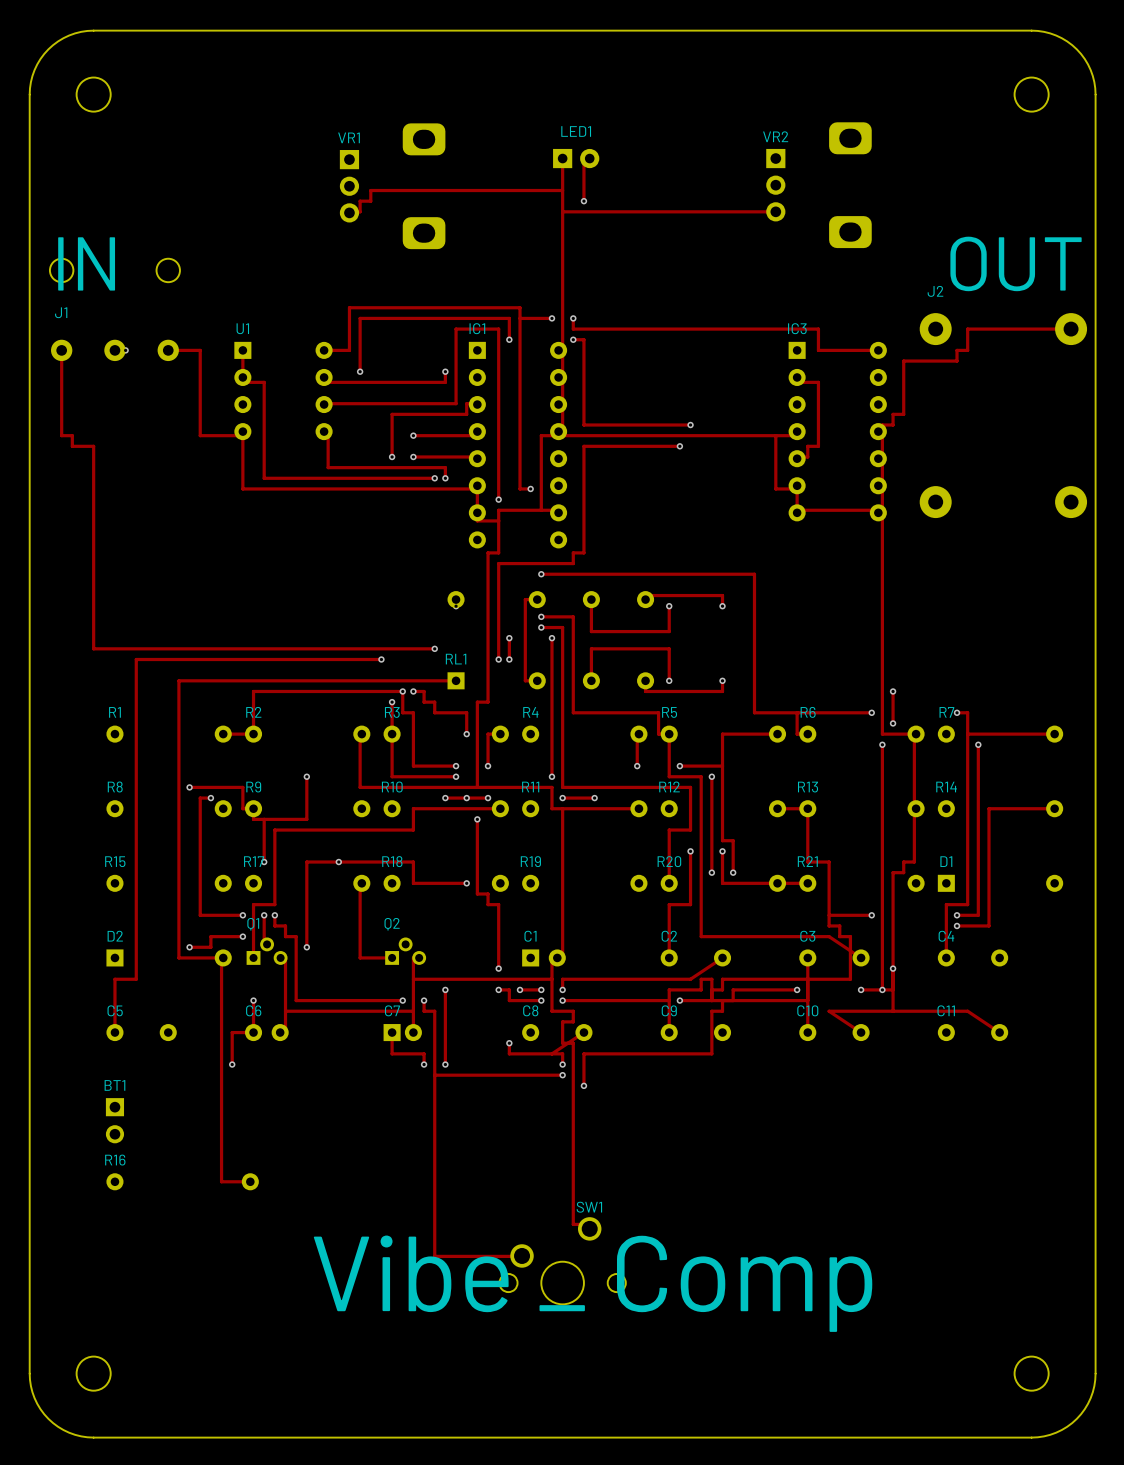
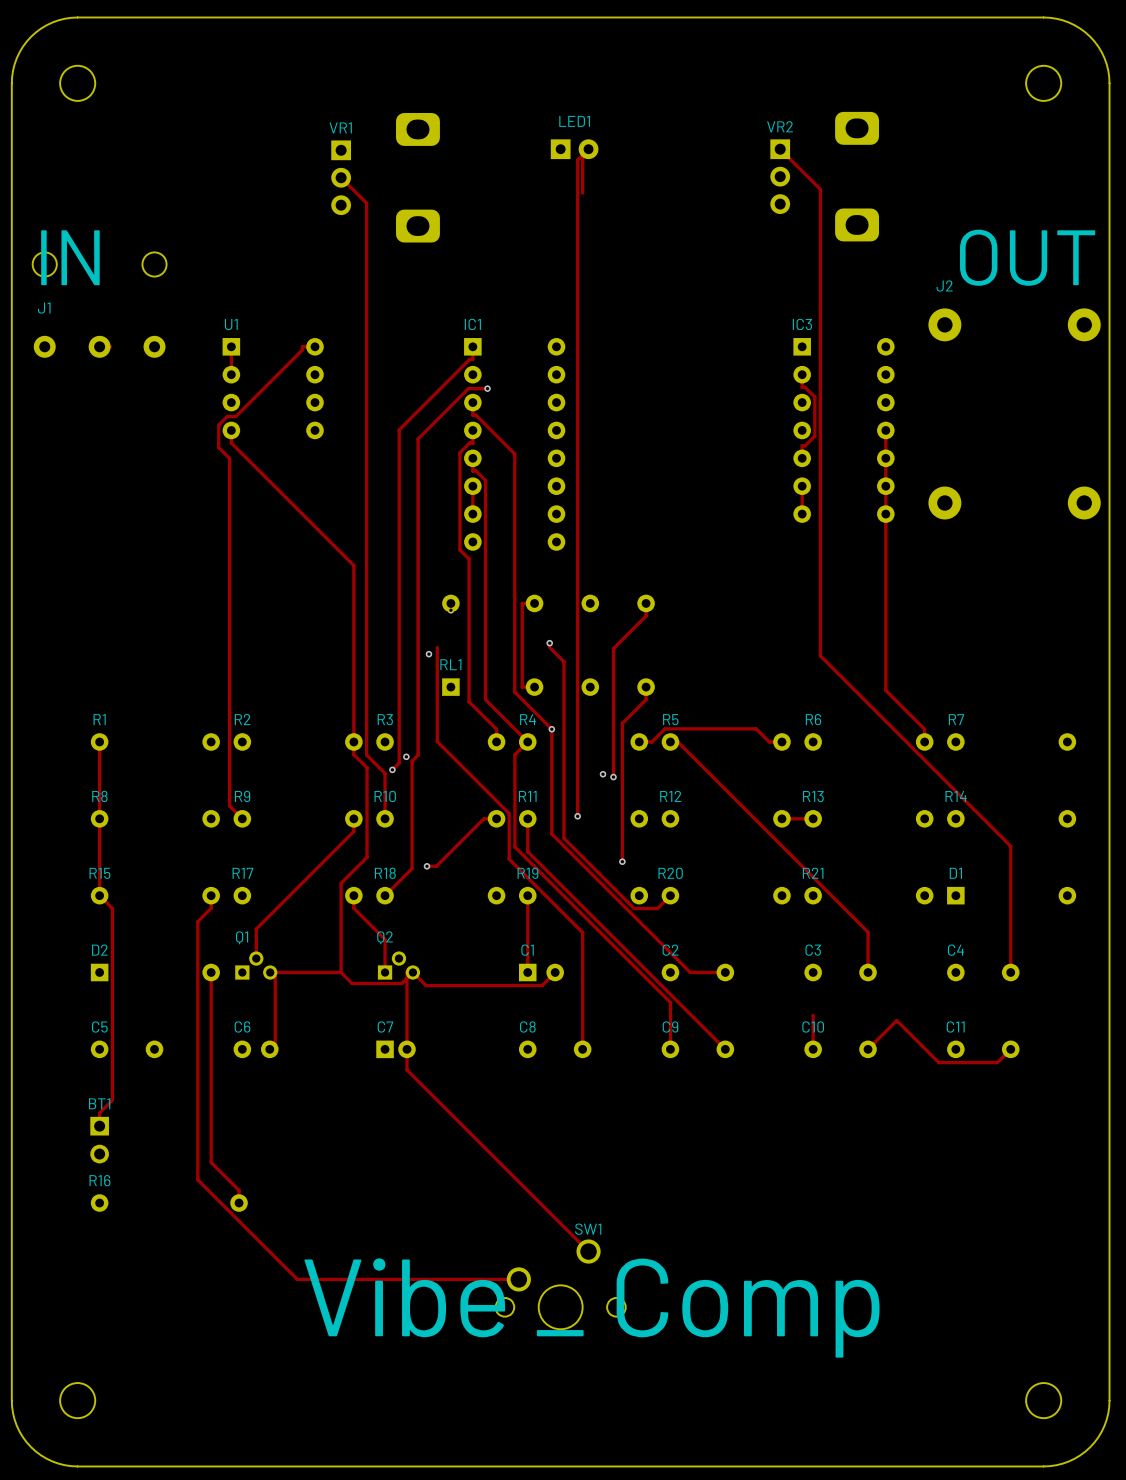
track: (562, 158) (562, 435) (558, 431) -> none
track: none -> (588, 149) (577, 160) (577, 816)
track: none -> (780, 149) (820, 189) (820, 655) (1010, 846) (1010, 972)
track: (562, 190) (370, 190) (370, 201) (360, 201) (360, 211) (349, 212) -> none
via: (583, 201) -> none
track: (562, 211) (775, 211) -> none
track: (520, 318) (551, 318) -> none
via: (551, 318) -> none
track: (573, 318) (573, 329) (818, 329) (818, 350) (882, 350) -> none
via: (573, 318) -> none
track: (1074, 329) (967, 329) (967, 350) (957, 350) (957, 361) (903, 361) (903, 414) (893, 414) (893, 425) (882, 425) (882, 734) (916, 734) -> (885, 430) (885, 690) (924, 729) (924, 741)
track: (509, 339) (509, 318) (360, 318) (360, 371) -> none
via: (509, 339) -> none
track: (573, 339) (583, 339) (583, 425) (690, 425) -> none
via: (573, 339) -> none
track: (61, 350) (61, 435) (72, 435) (72, 446) (93, 446) (93, 648) (434, 648) -> none
via: (125, 350) -> none
track: (168, 350) (200, 350) (200, 435) (242, 435) -> none
track: (324, 350) (349, 350) (349, 307) (520, 307) (520, 488) (530, 488) -> (315, 346) (302, 346) (302, 349) (235, 416) (227, 416) (218, 425) (218, 447) (229, 458) (229, 806) (242, 818)
track: none -> (472, 346) (472, 359) (469, 359) (399, 429) (399, 763) (392, 769)
via: (360, 371) -> none
track: (445, 371) (445, 382) (328, 382) (324, 377) -> none
via: (445, 371) -> none
track: (242, 377) (242, 382) (264, 382) (264, 478) (434, 478) -> none
track: (797, 382) (818, 382) (818, 446) (807, 446) (807, 456) (797, 456) -> (802, 379) (802, 387) (805, 387) (814, 397) (814, 436) (805, 445) (802, 445) (802, 456)
track: none -> (487, 388) (468, 388) (418, 438) (418, 755) (412, 761) (412, 868) (385, 895)
via: none -> (487, 388)
track: (324, 404) (456, 403) (456, 329) (498, 329) (498, 499) -> none
track: (477, 404) (466, 403) (466, 414) (392, 414) (392, 456) -> none
via: (690, 425) -> none
track: (324, 431) (328, 435) (328, 467) (445, 467) (445, 478) -> none
track: (797, 431) (797, 435) (541, 435) (541, 510) -> none
track: (413, 435) (477, 435) -> (496, 741) (496, 729) (469, 701) (469, 559) (459, 549) (459, 452) (469, 443) (472, 443) (472, 434)
via: (413, 435) -> none
track: (775, 435) (775, 488) (797, 488) -> none
track: (242, 443) (242, 488) (477, 488) -> (231, 443) (353, 565) (353, 754) (367, 767) (367, 857) (341, 883) (341, 972)
track: (679, 446) (583, 446) (583, 552) (573, 552) (573, 563) (498, 563) (498, 659) -> none
via: (679, 446) -> none
via: (392, 456) -> none
track: (413, 456) (477, 456) (477, 458) -> none
via: (413, 456) -> none
via: (434, 478) -> none
via: (445, 478) -> none
via: (530, 488) -> none
via: (498, 499) -> none
track: (797, 510) (882, 510) (878, 512) -> none
track: (477, 512) (477, 520) (498, 520) -> none
track: (558, 512) (562, 510) (498, 510) (498, 552) (488, 552) (488, 702) (477, 702) (477, 787) -> none
track: (541, 574) (754, 574) (754, 712) (871, 712) -> none
via: (541, 574) -> none
track: (591, 599) (591, 631) (669, 631) (669, 606) -> none
track: (645, 599) (645, 595) (722, 595) (722, 606) -> (646, 603) (646, 616) (613, 648) (613, 777)
via: (669, 606) -> none
via: (722, 606) -> none
track: (541, 616) (573, 616) (573, 712) (658, 712) (658, 734) (669, 734) (669, 776) (701, 776) (701, 936) (829, 936) (861, 957) -> (670, 741) (677, 741) (868, 932) (868, 972)
via: (541, 616) -> none
track: (541, 627) (562, 627) (562, 787) (690, 787) (690, 830) (669, 830) (669, 883) -> (549, 647) (563, 661) (563, 838) (634, 908) (657, 908) (670, 895)
via: (541, 627) -> none
track: (509, 638) (509, 659) -> none
via: (509, 638) -> none
track: (551, 638) (551, 776) -> none
track: (381, 659) (136, 659) (136, 979) (114, 979) (114, 1032) -> none
via: (381, 659) -> none
via: (498, 659) -> none
via: (509, 659) -> none
track: (456, 680) (178, 680) (178, 957) (223, 957) -> (239, 1203) (239, 1190) (211, 1162) (211, 972)
track: (591, 680) (591, 648) (669, 648) (669, 680) -> none
via: (669, 680) -> none
track: (722, 680) (722, 691) (645, 691) -> (622, 861) (622, 723) (646, 698)
via: (722, 680) -> none
via: (402, 691) -> none
track: (413, 691) (424, 691) (424, 702) (434, 702) (434, 712) (466, 712) (466, 734) -> none
via: (413, 691) -> none
track: (893, 691) (893, 723) -> none
via: (893, 691) -> none
track: (392, 702) (392, 764) -> (341, 177) (366, 203) (366, 755) (385, 773)
via: (392, 702) -> none
track: (797, 712) (797, 734) (807, 734) -> none
via: (871, 712) -> none
track: (957, 712) (967, 712) (967, 904) (946, 904) (946, 957) -> none
via: (957, 712) -> none
via: none -> (551, 729)
via: (893, 723) -> none
track: none -> (99, 741) (99, 895) (112, 908) (112, 1100) (99, 1112) (99, 1126)
track: (221, 734) (253, 734) (253, 691) (402, 691) (402, 712) (413, 712) (413, 766) (456, 766) -> none
track: (361, 734) (360, 734) (360, 787) (551, 787) (551, 808) (638, 808) -> none
via: (466, 734) -> none
track: (500, 734) (488, 734) (488, 766) -> none
track: (638, 734) (637, 734) (637, 766) -> (639, 741) (651, 741) (665, 728) (756, 728) (769, 741)
track: (765, 734) (722, 734) (722, 840) (733, 840) (733, 872) -> none
track: (914, 734) (914, 862) (903, 862) (903, 872) (893, 872) (893, 1011) -> none
track: (967, 734) (1054, 734) -> none
track: (882, 744) (882, 989) -> none
via: (882, 744) -> none
track: (978, 744) (978, 915) (957, 915) -> none
via: (978, 744) -> none
via: none -> (406, 756)
via: none -> (392, 769)
via: none -> (603, 774)
via: (456, 766) -> none
via: (488, 766) -> none
via: (637, 766) -> none
track: (679, 766) (722, 766) -> none
via: (679, 766) -> none
via: none -> (613, 777)
track: (306, 776) (306, 819) (253, 819) (253, 808) (242, 808) (242, 787) (189, 787) -> none
via: (306, 776) -> none
track: (392, 776) (456, 776) -> (385, 785) (385, 818)
via: (456, 776) -> none
via: (551, 776) -> none
track: (711, 776) (711, 872) -> none
via: (711, 776) -> none
via: (189, 787) -> none
track: (210, 798) (200, 798) (200, 915) (242, 915) -> none
via: (210, 798) -> none
track: (445, 798) (488, 798) -> none
via: (445, 798) -> none
via: (466, 798) -> none
via: (488, 798) -> none
track: (562, 798) (594, 798) -> none
via: (562, 798) -> none
via: (594, 798) -> none
via: none -> (577, 816)
track: (488, 808) (413, 808) (413, 830) (274, 830) (274, 904) (253, 904) (253, 957) -> (483, 818) (436, 866) (426, 866)
track: none -> (527, 818) (527, 851) (725, 1049)
track: (562, 808) (562, 957) (551, 957) (551, 1011) (573, 1011) (573, 1021) (562, 1021) (562, 1043) (573, 1043) (573, 1224) (594, 1224) (589, 1228) -> (406, 1049) (406, 1069) (588, 1251)
track: (807, 808) (807, 862) (829, 862) (829, 925) (839, 925) (839, 936) (850, 936) (850, 979) (722, 979) (722, 989) (711, 989) -> none
track: (1054, 808) (988, 808) (988, 925) (957, 925) -> none
track: (264, 819) (264, 862) -> none
track: (477, 819) (477, 893) (488, 893) (488, 904) (498, 904) (498, 968) -> none
via: (477, 819) -> none
via: none -> (622, 861)
track: (690, 851) (690, 904) (669, 904) (669, 957) -> none
via: (690, 851) -> none
track: (722, 851) (722, 883) (807, 883) -> none
via: (722, 851) -> none
via: none -> (426, 866)
via: (264, 862) -> none
via: (338, 862) -> none
via: (711, 872) -> none
via: (733, 872) -> none
track: (361, 883) (360, 883) (360, 957) (392, 957) -> (353, 895) (353, 908) (385, 939) (385, 972)
track: (466, 883) (413, 883) (413, 862) (306, 862) (306, 947) -> none
via: (466, 883) -> none
via: (242, 915) -> none
track: (264, 915) (264, 947) (267, 944) -> (353, 818) (353, 831) (256, 929) (256, 958)
via: (264, 915) -> none
track: (274, 915) (274, 925) (285, 925) (285, 936) (296, 936) (296, 1000) (402, 1000) -> none
via: (274, 915) -> none
track: (829, 915) (871, 915) -> none
via: (871, 915) -> none
via: (957, 915) -> none
via: (957, 925) -> none
track: (242, 936) (210, 936) (210, 947) (189, 947) -> none
via: (242, 936) -> none
via: (189, 947) -> none
via: (306, 947) -> none
track: (221, 957) (221, 1181) (253, 1181) -> none
track: none -> (275, 972) (341, 972)
track: none -> (341, 972) (352, 983) (401, 983) (412, 972) (426, 985) (542, 985) (555, 972)
track: (722, 957) (690, 979) (562, 979) (562, 989) -> (725, 972) (690, 972) (551, 834) (551, 729) (514, 692) (514, 453) (476, 415) (472, 415) (472, 402)
track: (807, 957) (807, 999) -> none
via: (498, 968) -> none
via: (893, 968) -> none
track: (413, 979) (551, 979) -> none
track: (445, 989) (445, 1064) -> (527, 895) (527, 972)
via: (445, 989) -> none
track: (498, 989) (509, 989) (509, 1000) (541, 1000) -> none
via: (498, 989) -> none
track: (520, 989) (541, 989) -> none
via: (520, 989) -> none
via: (541, 989) -> none
via: (562, 989) -> none
track: (669, 989) (701, 989) (701, 979) (711, 979) (711, 1000) -> (670, 1005) (670, 1002) (514, 846) (514, 754) (527, 741) (485, 699) (485, 480) (476, 470) (472, 470) (472, 458)
track: (797, 989) (733, 989) (733, 1000) -> none
via: (797, 989) -> none
track: (861, 989) (893, 989) -> none
via: (861, 989) -> none
via: (882, 989) -> none
track: (253, 1000) (253, 1032) (232, 1032) (232, 1064) -> none
via: (253, 1000) -> none
via: (402, 1000) -> none
track: (424, 1000) (424, 1011) (434, 1011) (434, 1256) (522, 1255) -> (211, 895) (211, 908) (197, 921) (197, 1179) (297, 1279) (518, 1279)
via: (424, 1000) -> none
via: (541, 1000) -> none
track: (562, 1000) (669, 1000) -> none
via: (562, 1000) -> none
track: (679, 1000) (807, 1000) -> none
via: (679, 1000) -> none
track: (722, 1000) (722, 1011) (711, 1011) (711, 1053) (583, 1053) (583, 1085) -> none
track: (285, 1011) (413, 1011) -> none
track: (392, 1032) (392, 1053) (424, 1053) (424, 1064) -> none
track: (583, 1032) (551, 1053) -> (582, 1049) (582, 932) (509, 859) (509, 813) (437, 741) (437, 647)
track: (861, 1032) (829, 1011) (967, 1011) (999, 1032) -> (868, 1049) (896, 1020) (938, 1062) (997, 1062) (1010, 1049)
track: (509, 1043) (509, 1053) (562, 1053) (562, 1064) -> none
via: (509, 1043) -> none
via: (232, 1064) -> none
via: (424, 1064) -> none
via: (445, 1064) -> none
via: (562, 1064) -> none
track: (434, 1075) (562, 1075) -> none
via: (562, 1075) -> none
via: (583, 1085) -> none

